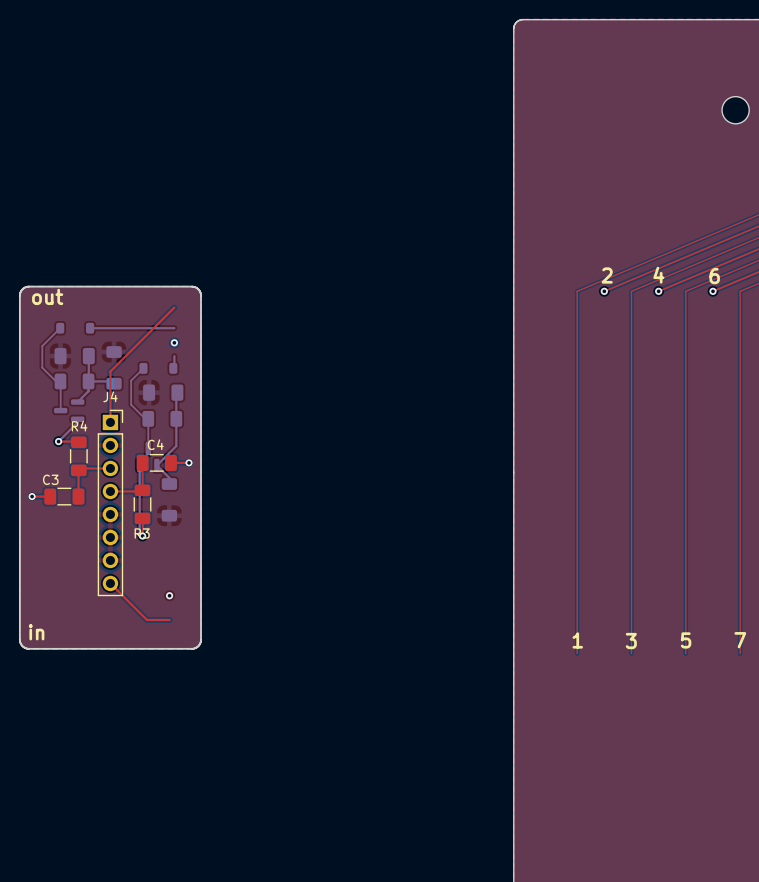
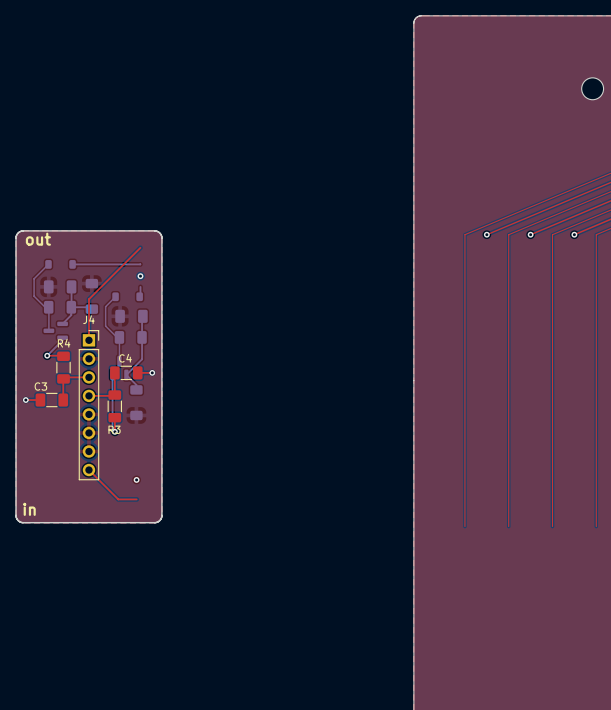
text: 2 (607, 275) -> none
text: 4 (658, 275) -> none
text: 6 (714, 276) -> none
text: 1 (577, 640) -> none
text: 5 (686, 640) -> none
text: 7 (740, 640) -> none
text: 3 (631, 641) -> none

